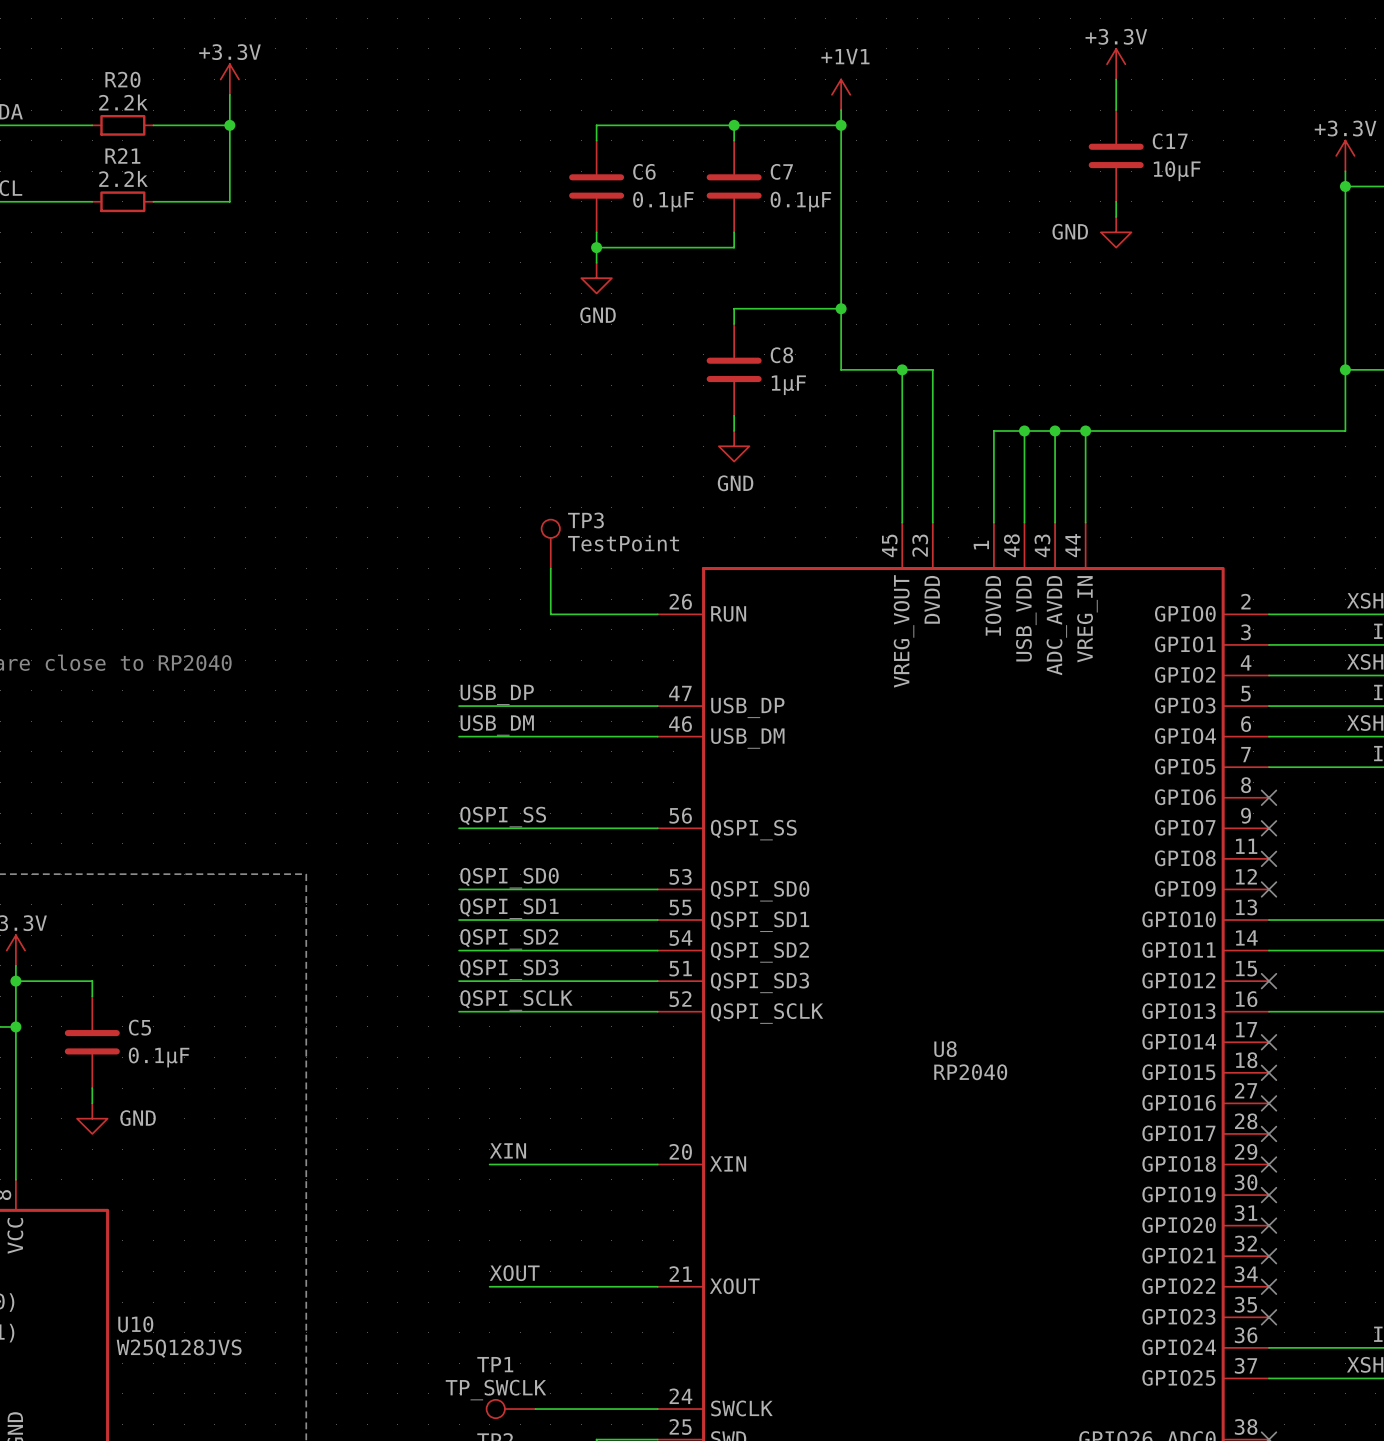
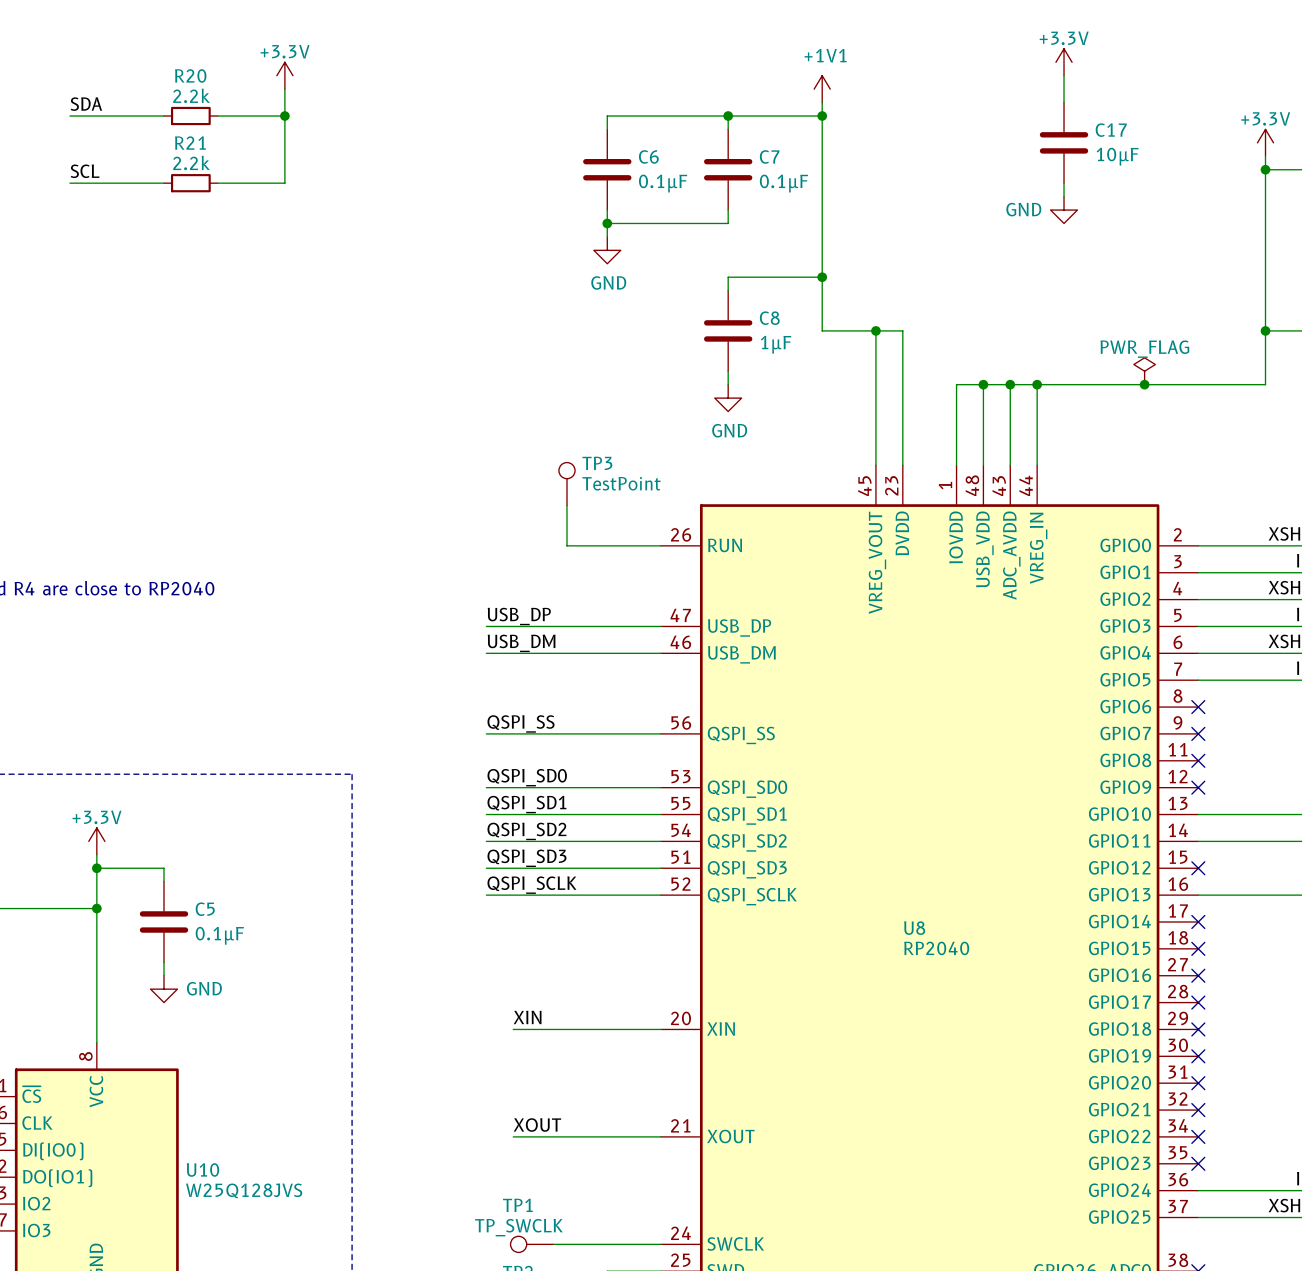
power symbol: none -> PWR_FLAG (1144, 371)
junction: none -> (1144, 384)

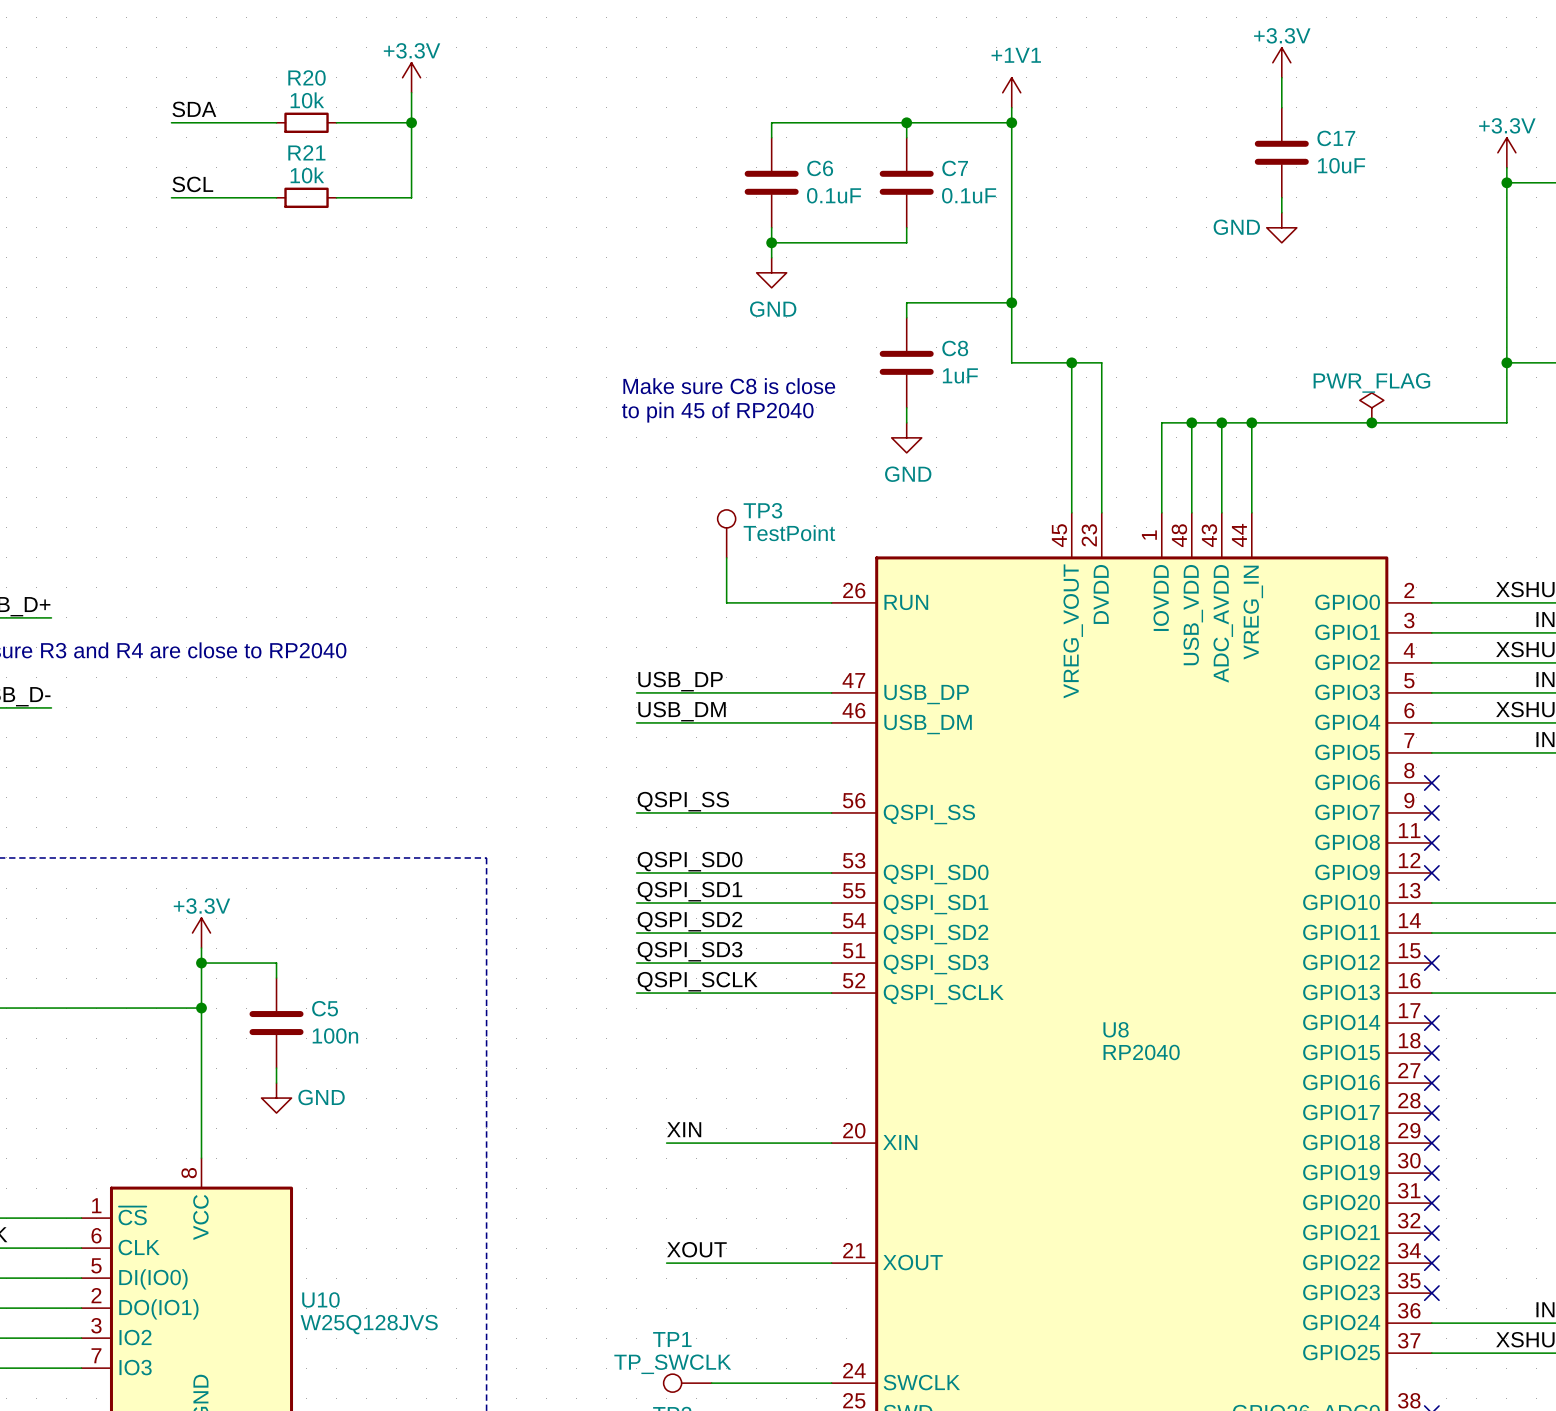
R20 value: 2.2k (191, 95) -> 10k (307, 100)
C17 value: 10µF (1117, 156) -> 10uF (1341, 165)
R21 value: 2.2k (191, 162) -> 10k (307, 175)
C6 value: 0.1µF (663, 183) -> 0.1uF (834, 195)
C7 value: 0.1µF (783, 183) -> 0.1uF (969, 195)
C8 value: 1µF (776, 344) -> 1uF (960, 375)
text: none -> Make sure C8 is close (729, 386)
text: none -> to pin 45 of RP2040 (717, 412)
C5 value: 0.1µF (219, 935) -> 100n (335, 1035)

